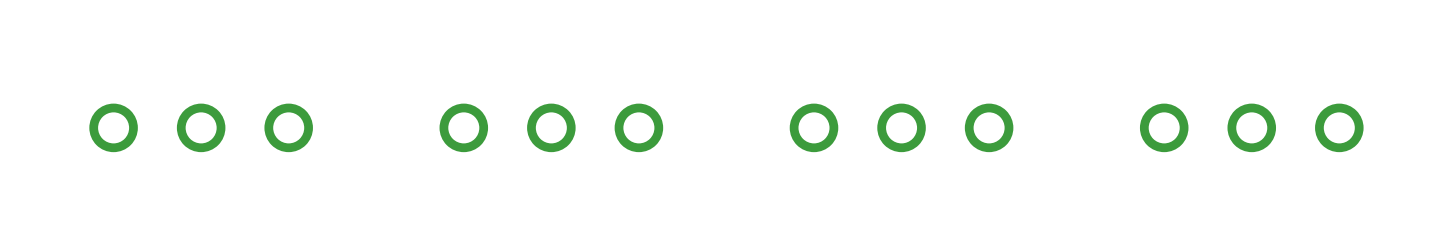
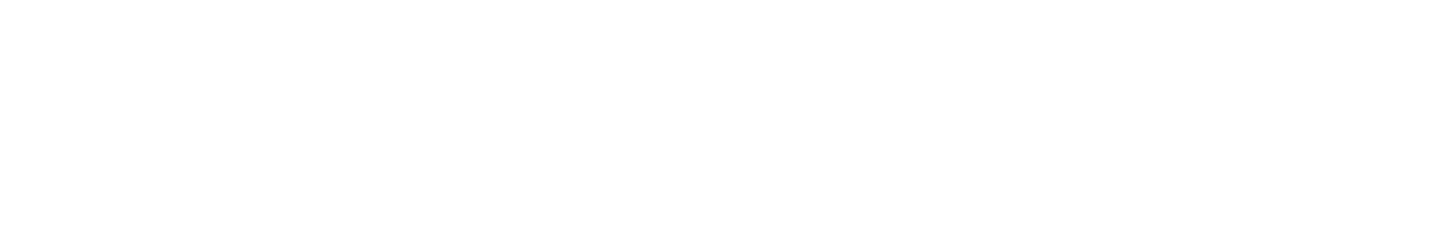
part: (201, 127) -> none
part: (551, 127) -> none
part: (901, 127) -> none
part: (1251, 127) -> none

